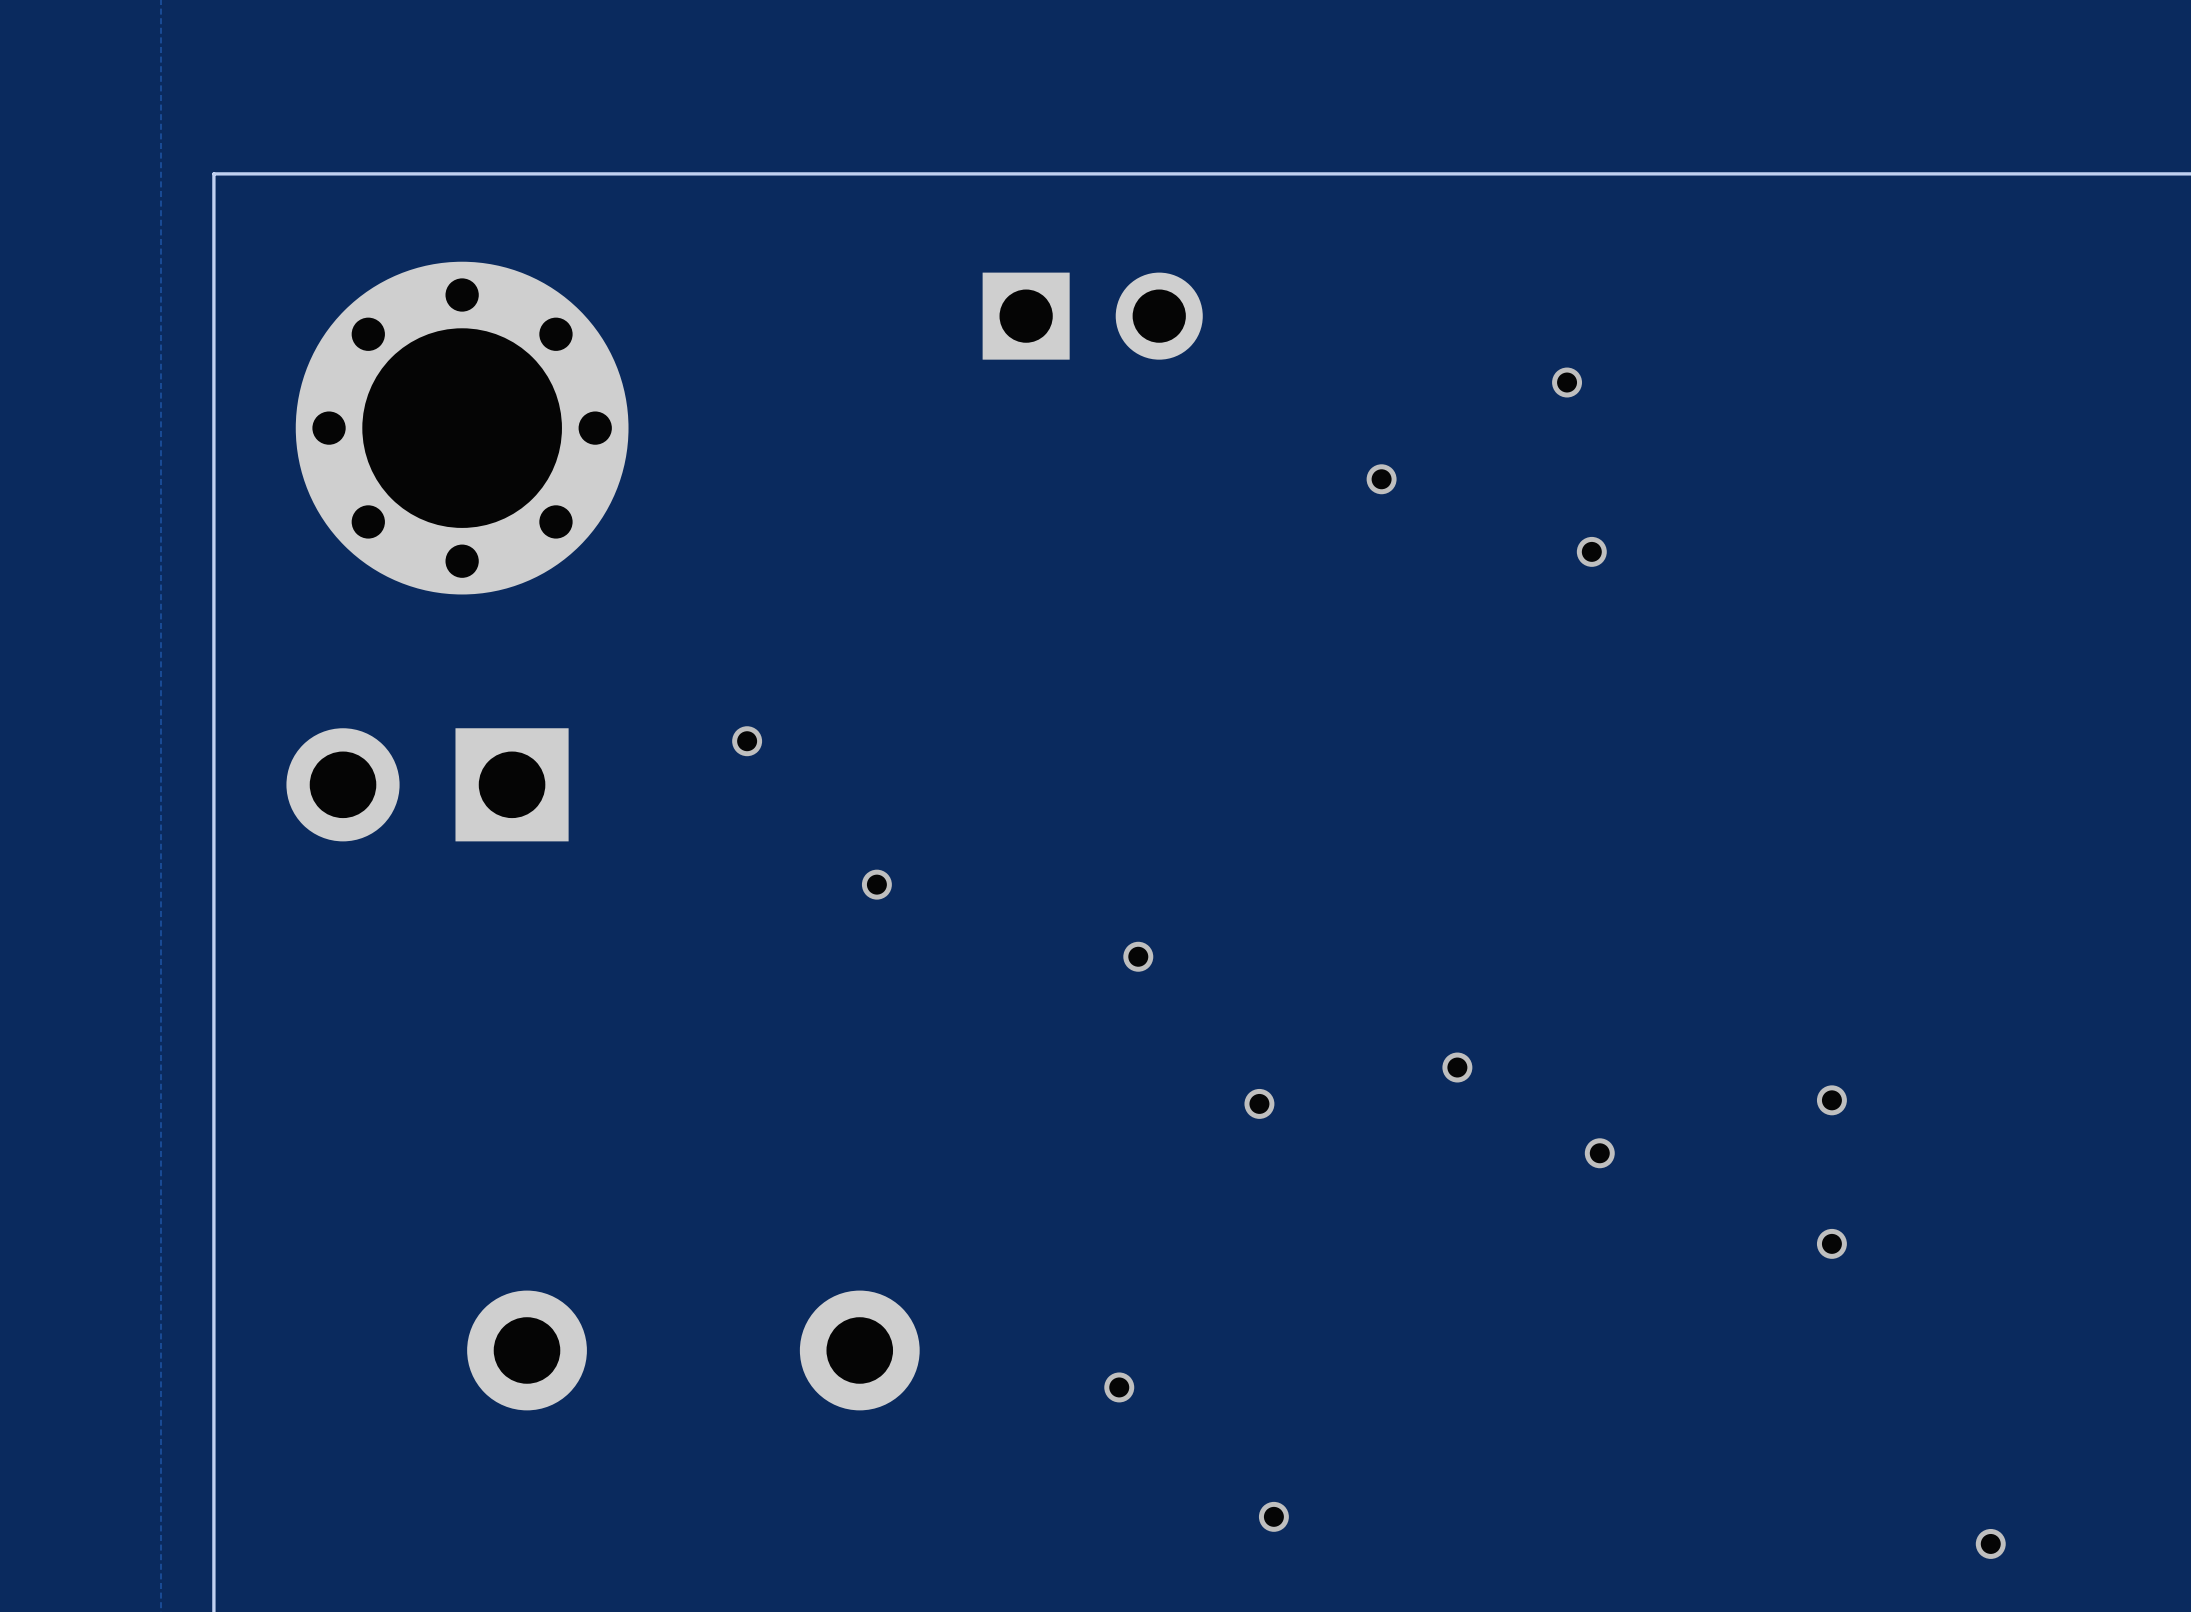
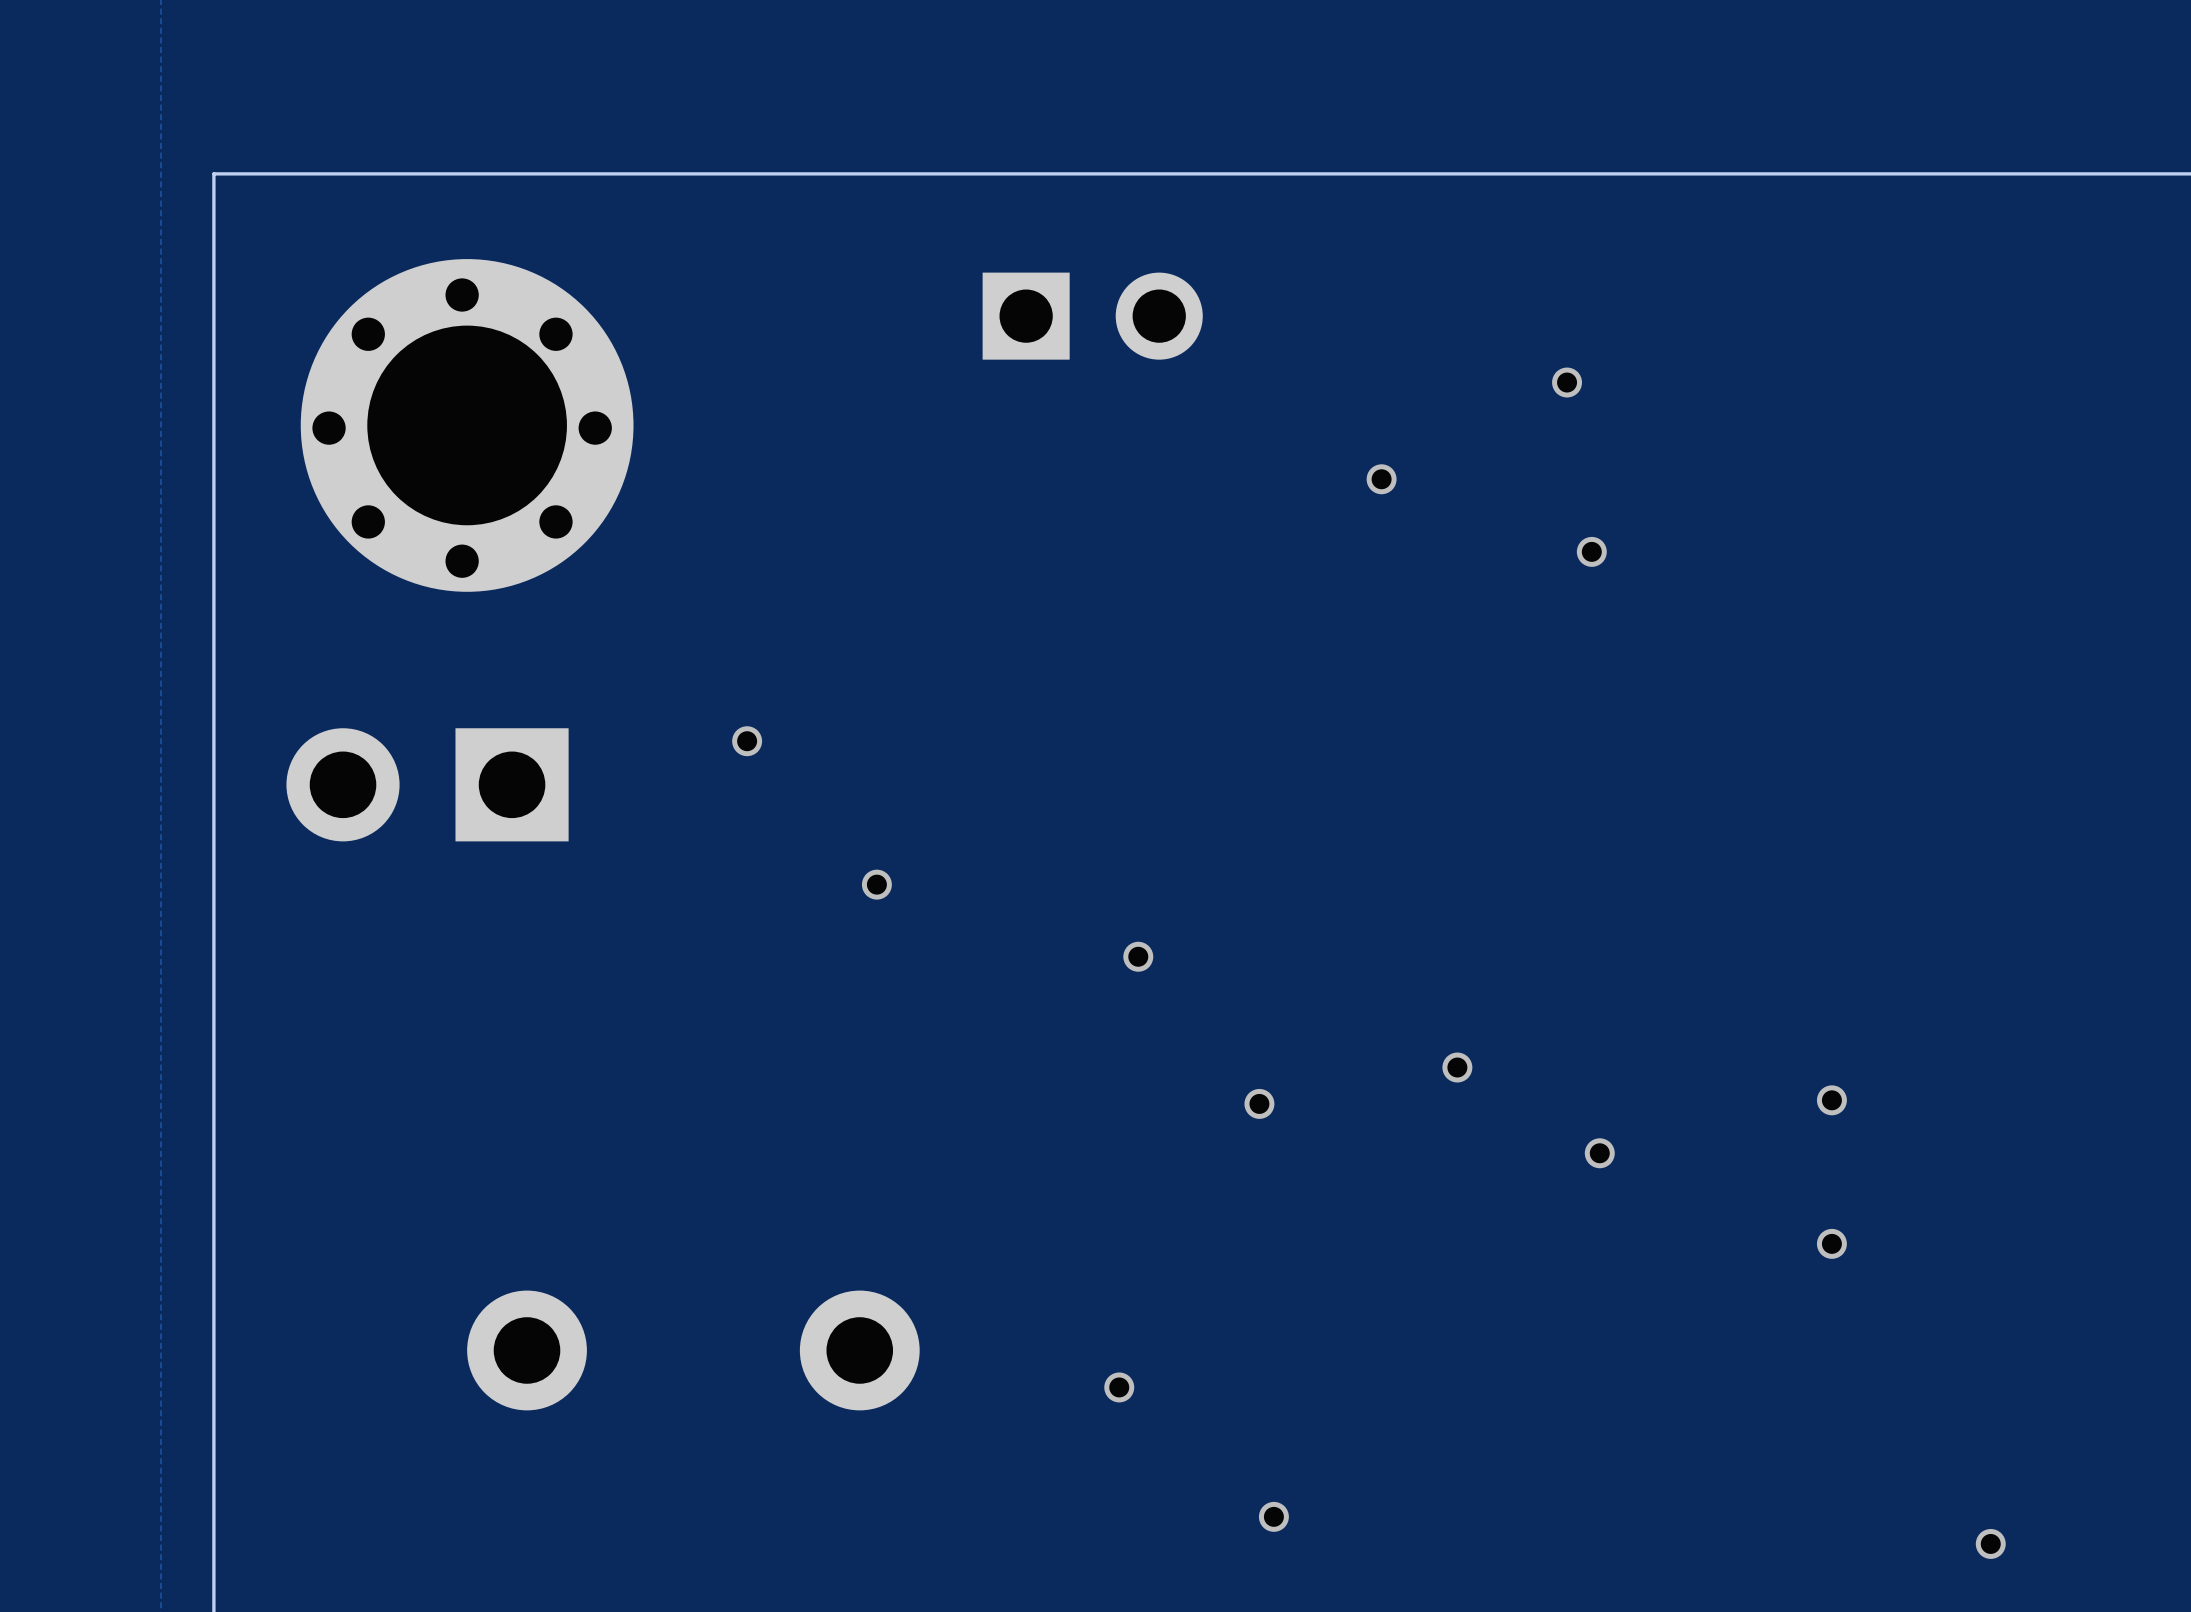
part footprint: [295, 261, 629, 595] -> [300, 259, 634, 592]

